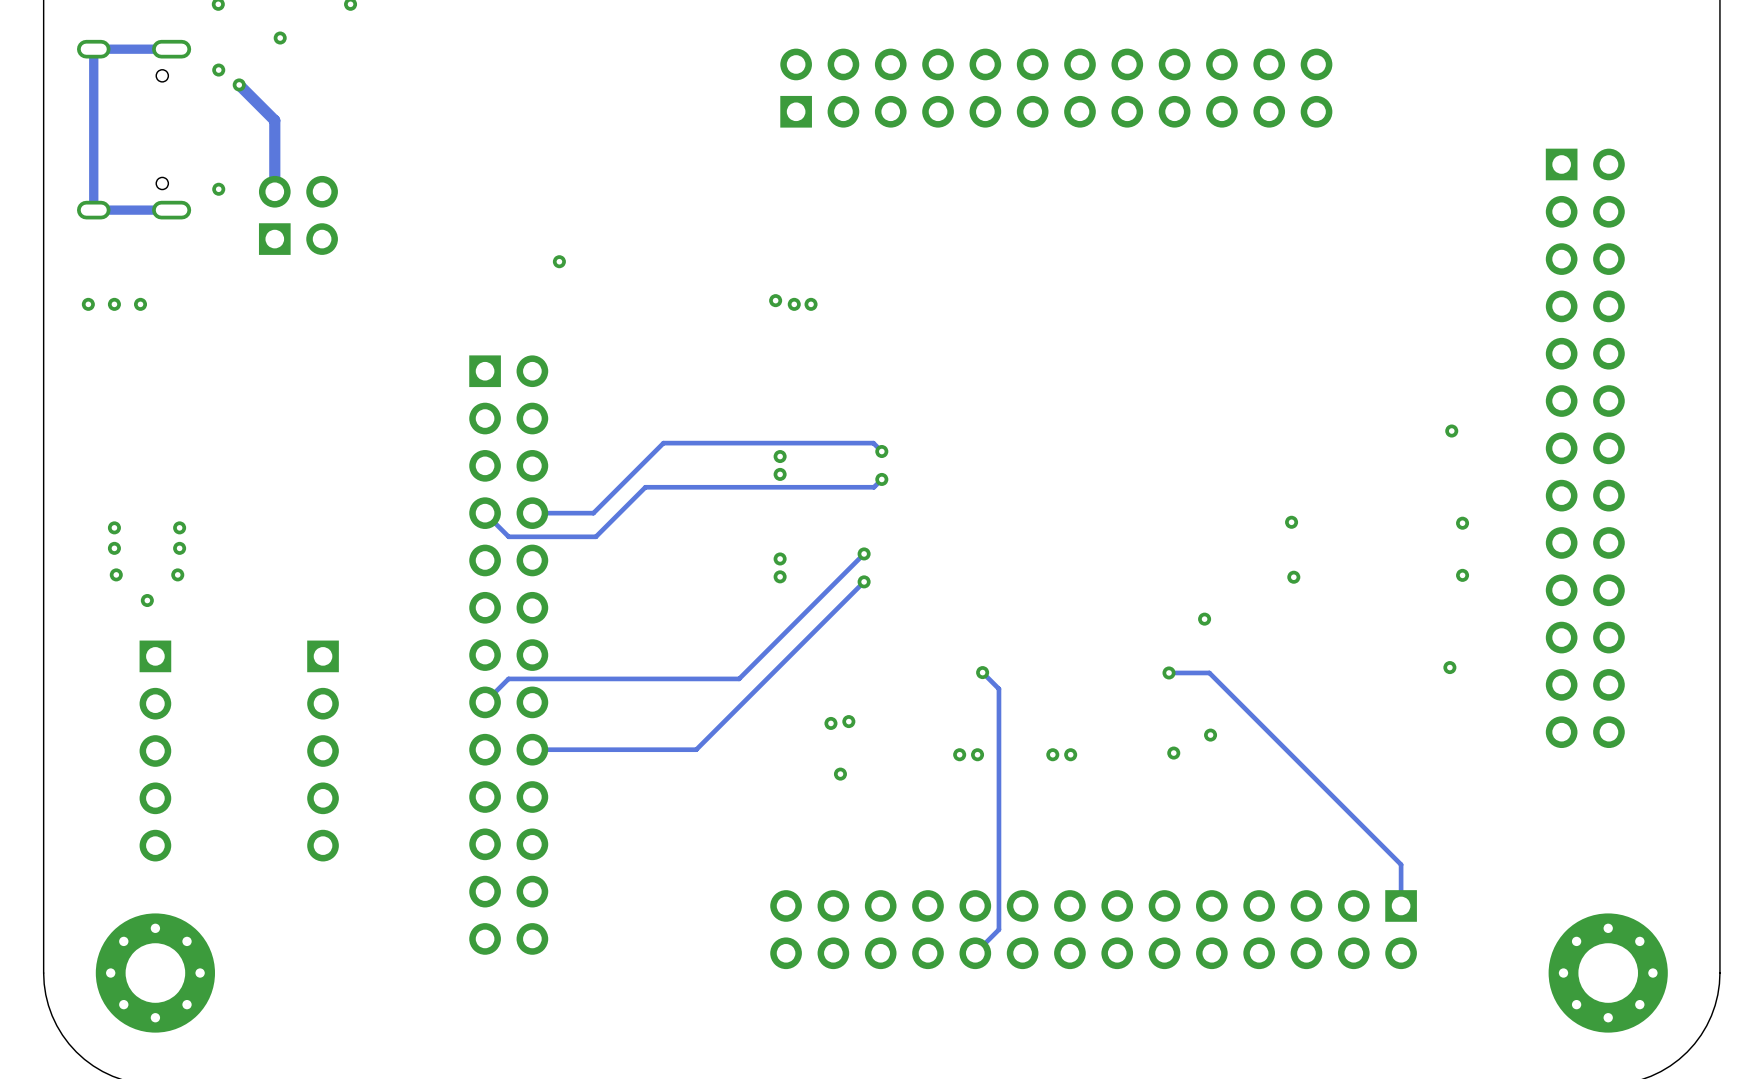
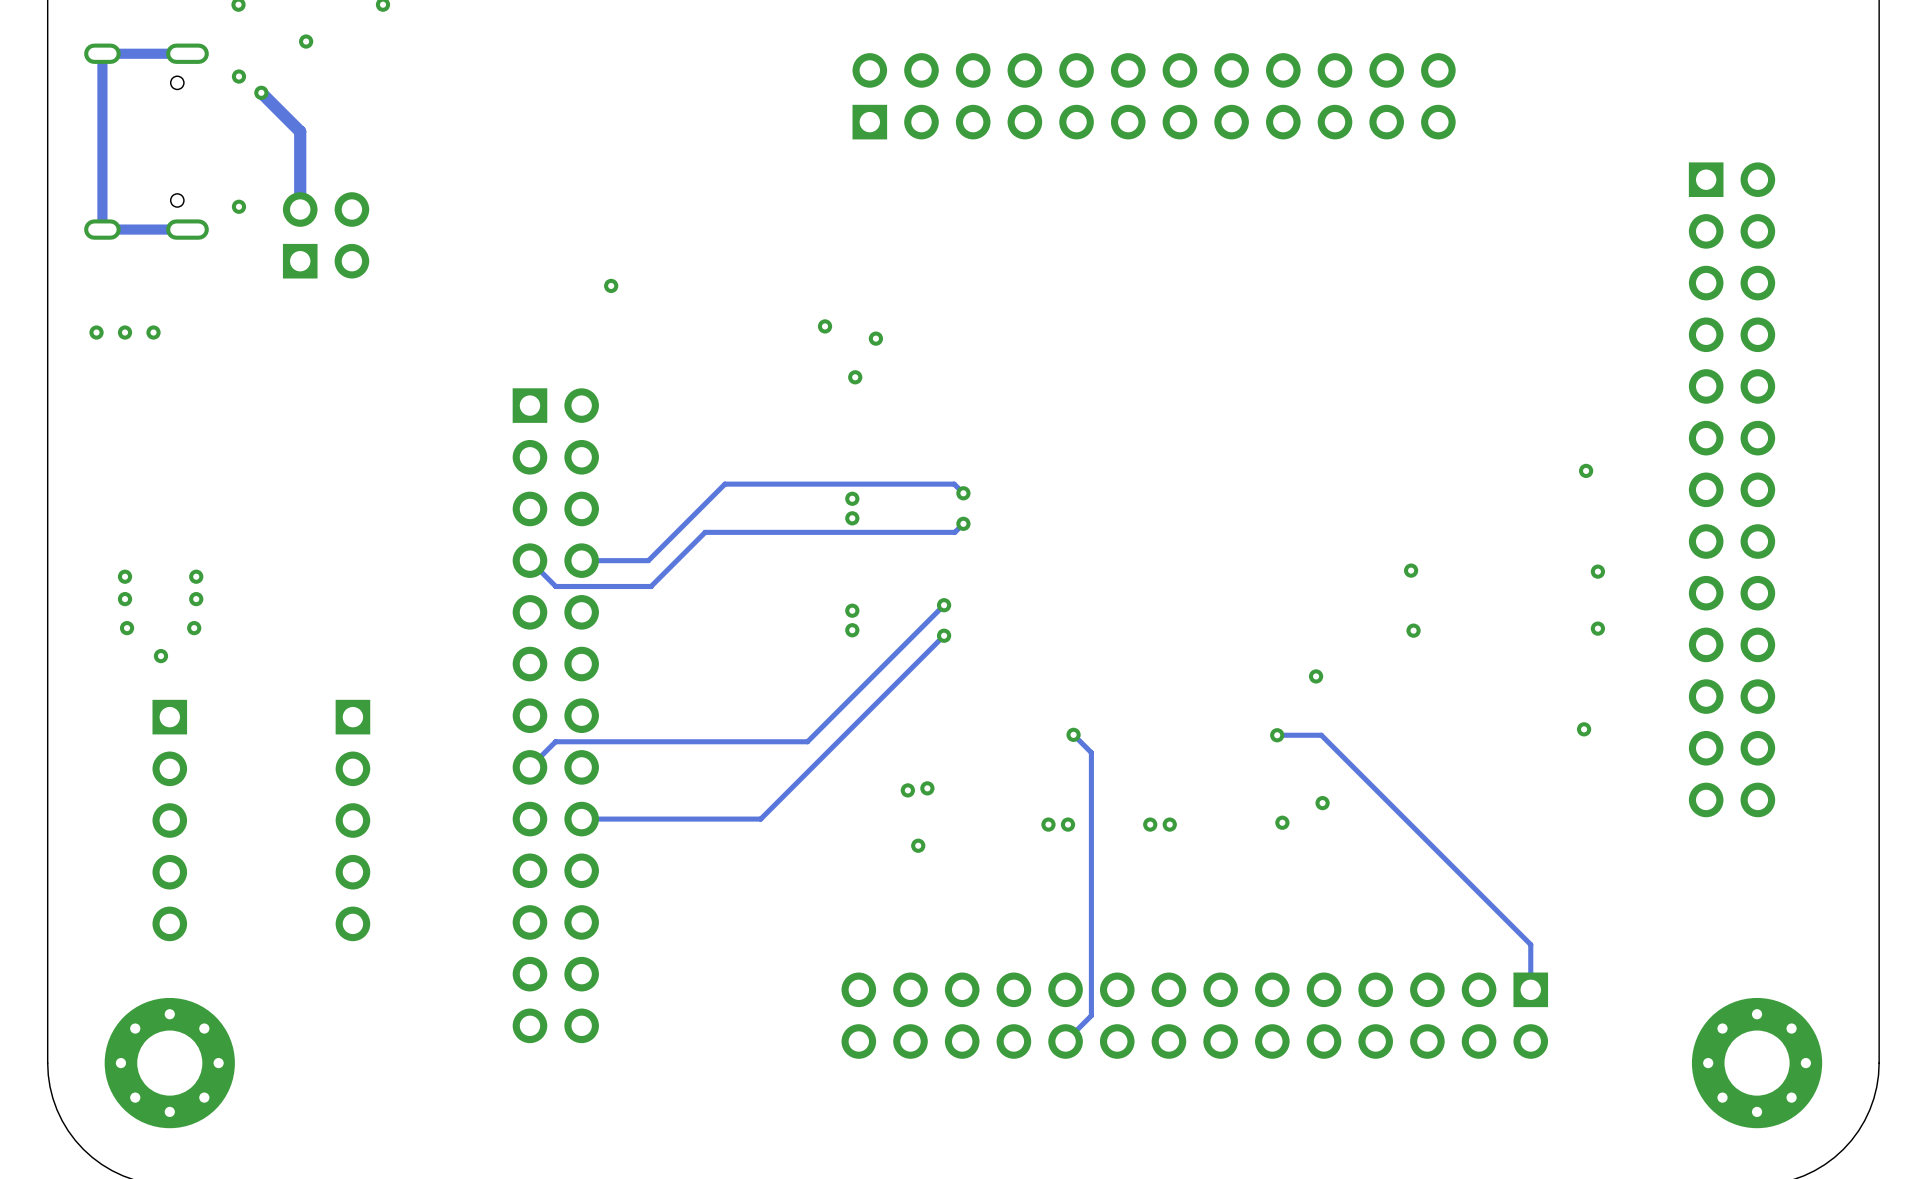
via: none -> (825, 326)
via: (775, 300) -> none
via: (794, 304) -> none
via: (811, 304) -> none
via: none -> (875, 338)
via: none -> (855, 377)

